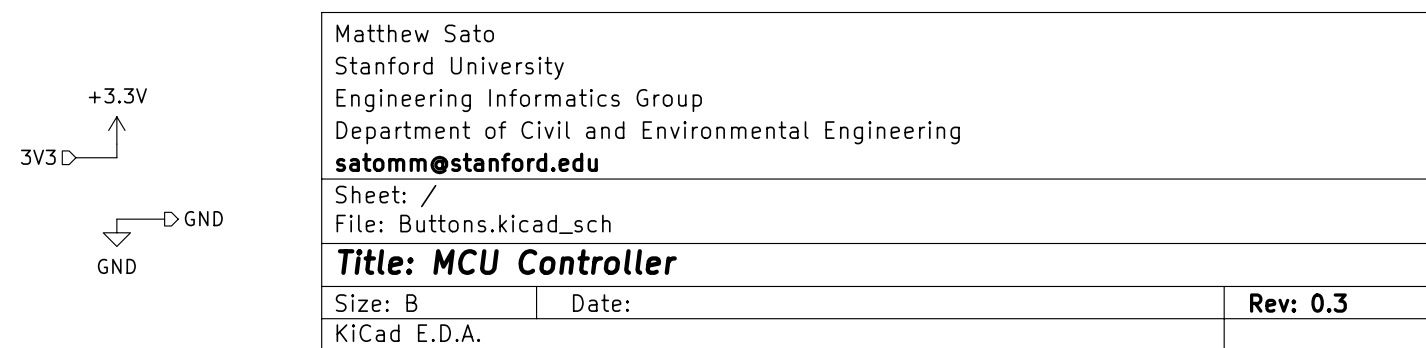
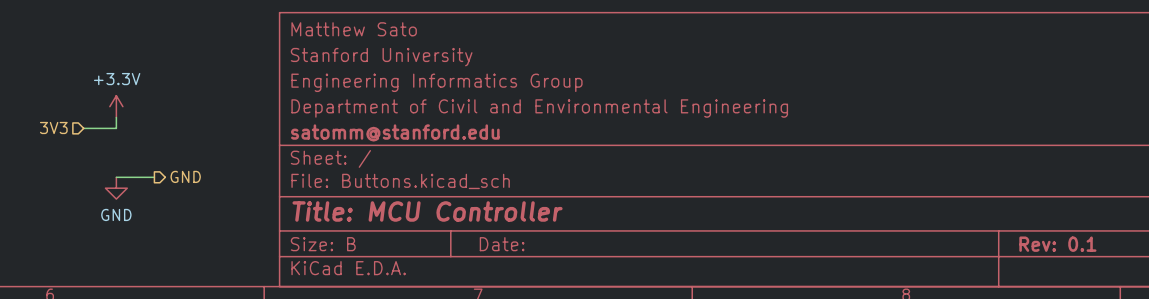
title block: Rev: 0.3 (1298, 303) -> Rev: 0.1 (1057, 244)

